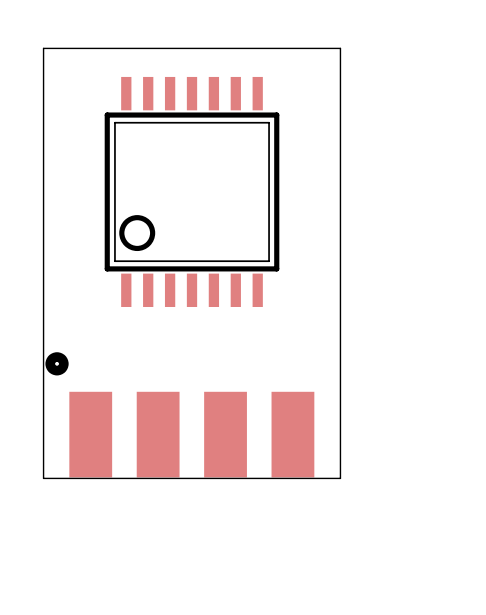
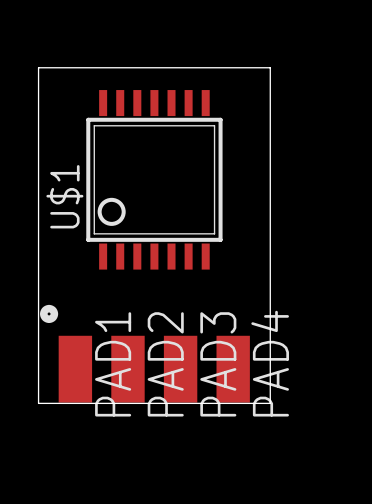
U$1 name: none -> U$1 (64, 196)
PAD4 name: none -> PAD4 (270, 363)
PAD1 name: none -> PAD1 (113, 364)
PAD2 name: none -> PAD2 (165, 364)
PAD3 name: none -> PAD3 (218, 364)

